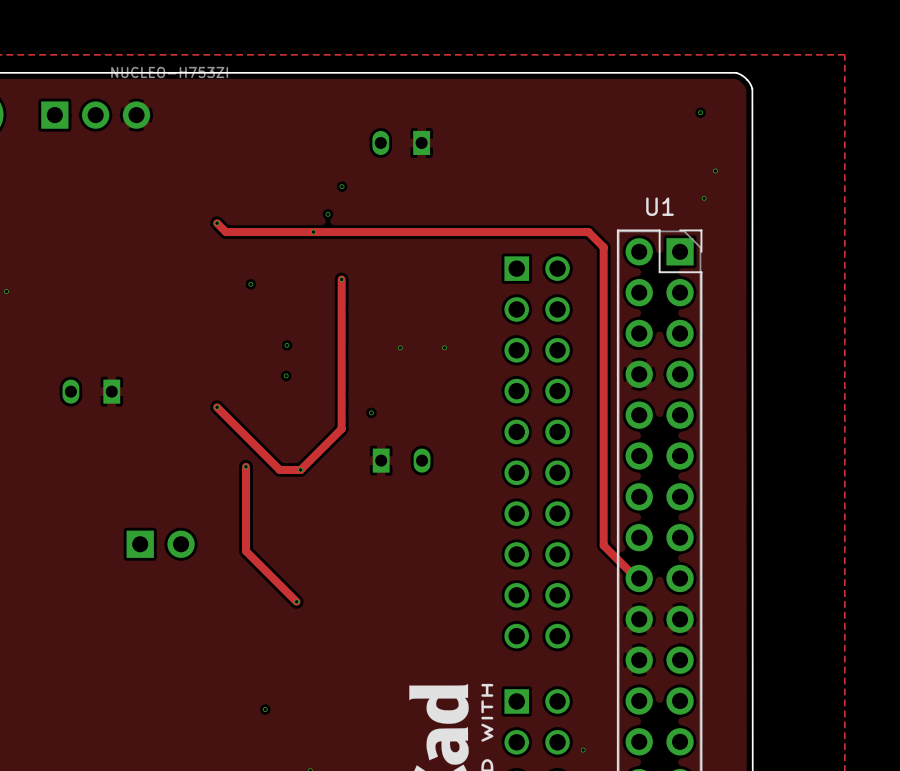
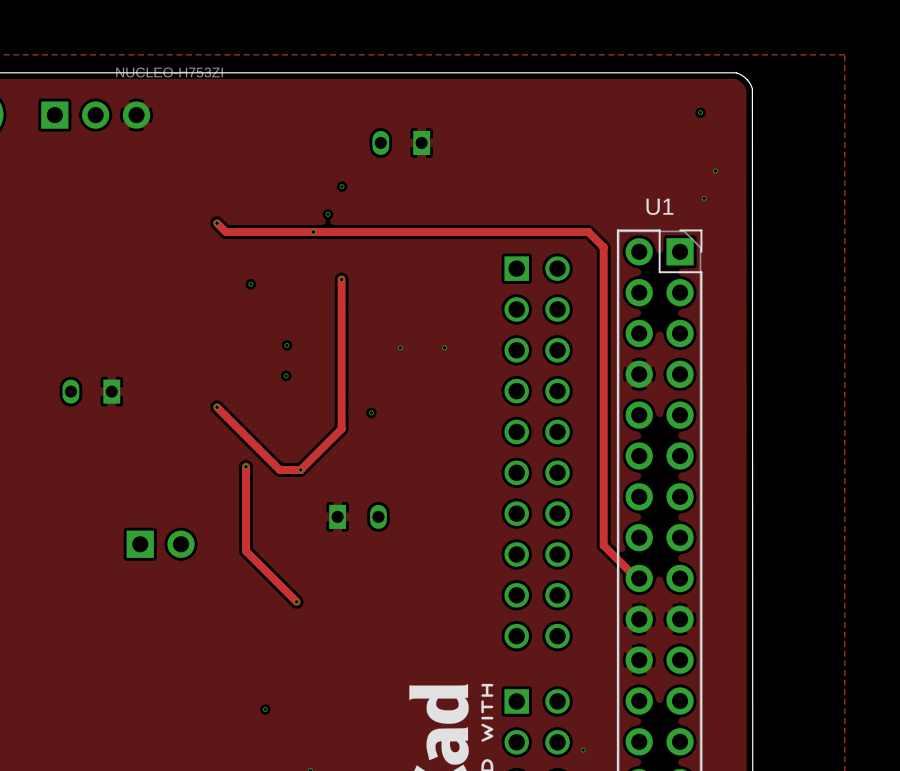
via: (6, 291) -> none
part position: (401, 460) -> (358, 516)

